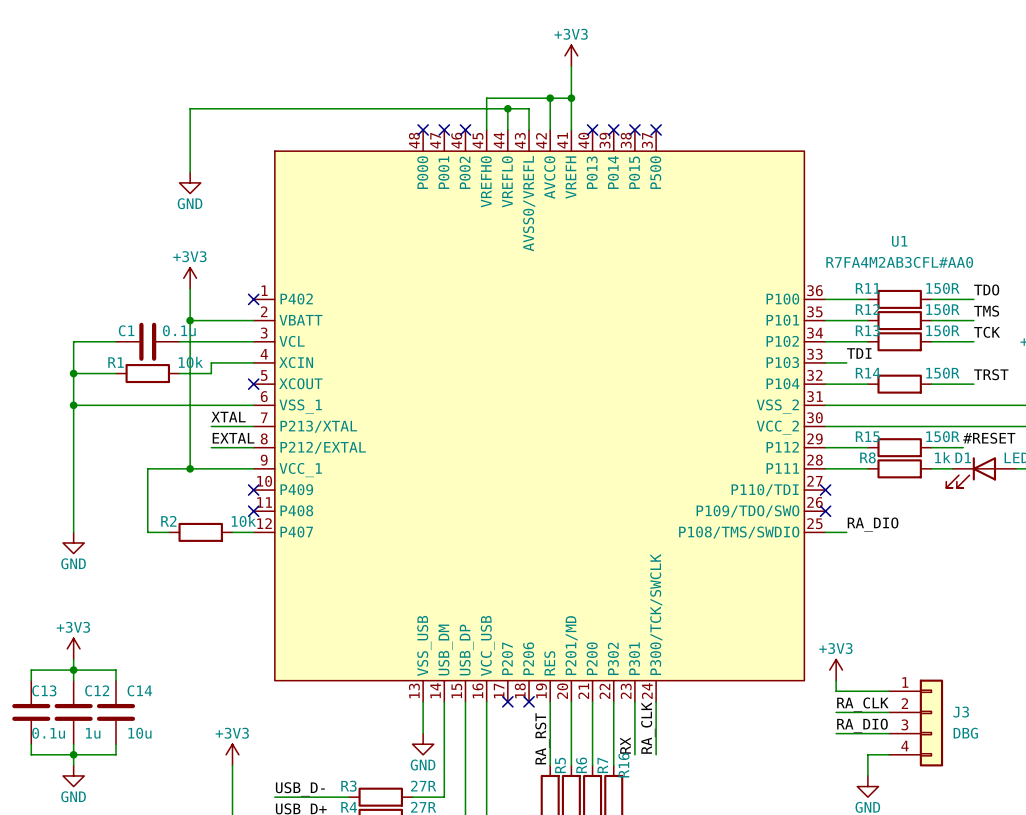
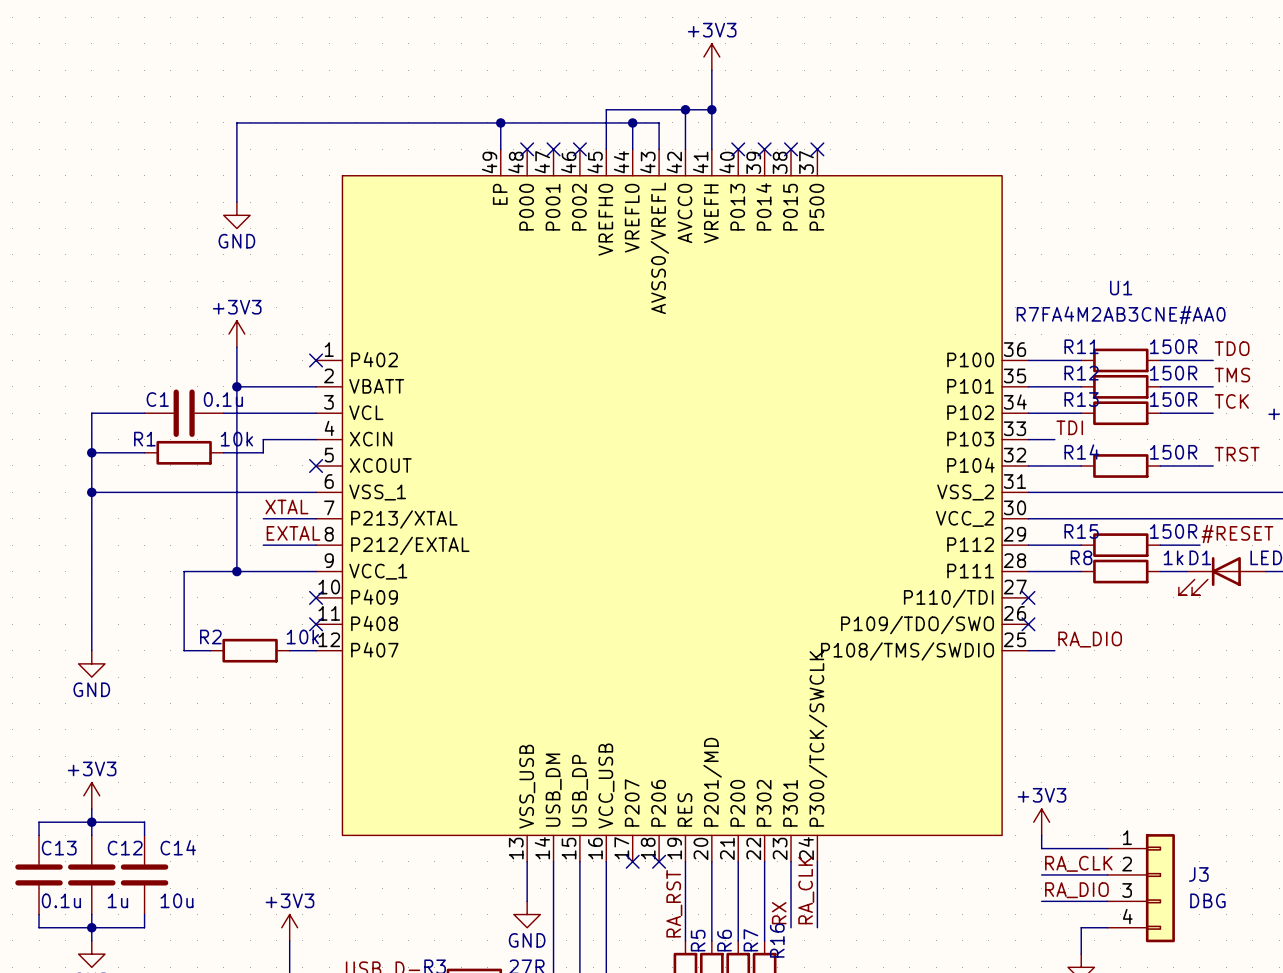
wire: none -> (500, 122) (500, 149)
junction: none -> (500, 122)
U1 symbol: [253, 129, 826, 702] -> [316, 149, 1029, 862]
U1 value: R7FA4M2AB3CFL#AA0 (899, 262) -> R7FA4M2AB3CNE#AA0 (1121, 315)

